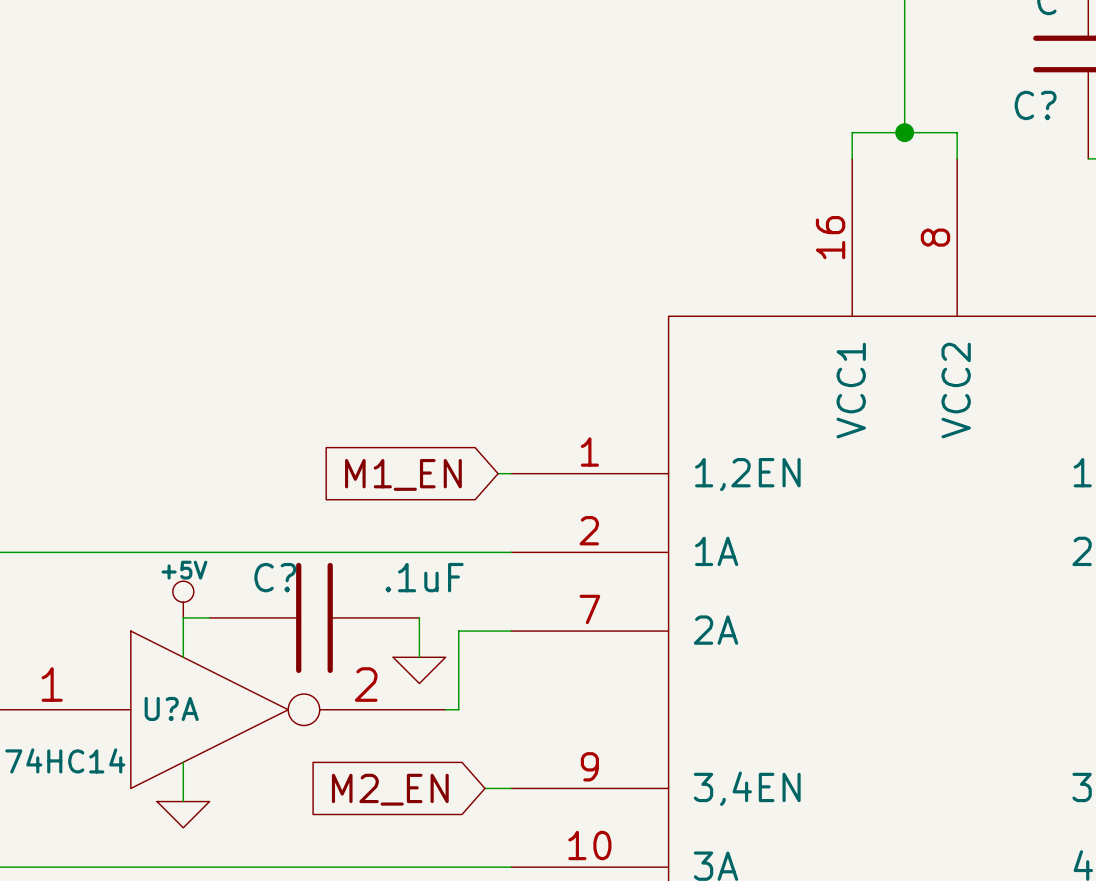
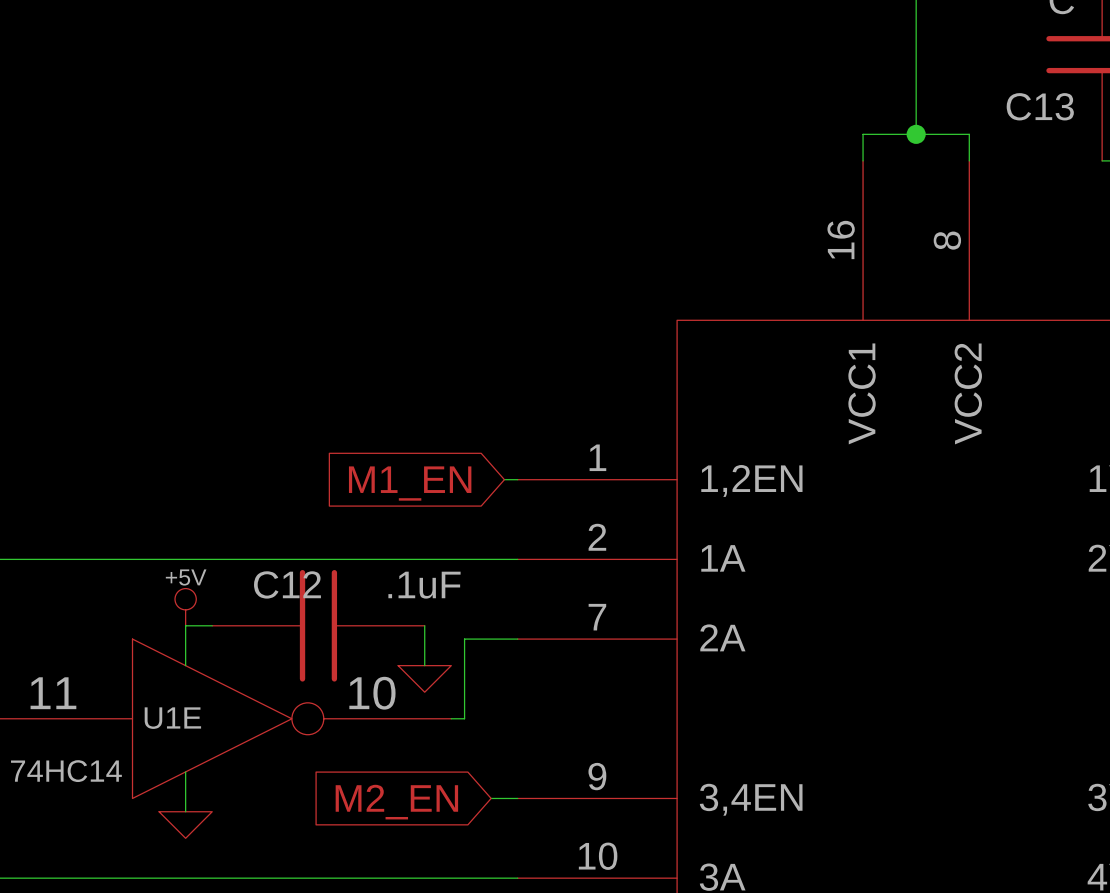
C? name: C? (1035, 105) -> C13 (1040, 106)
C? name: C? (275, 577) -> C12 (287, 584)
U?A pin number: 1 (52, 684) -> 11 (53, 693)
U?A pin number: 2 (366, 684) -> 10 (372, 693)
U?A name: U?A (171, 708) -> U1E (172, 718)

